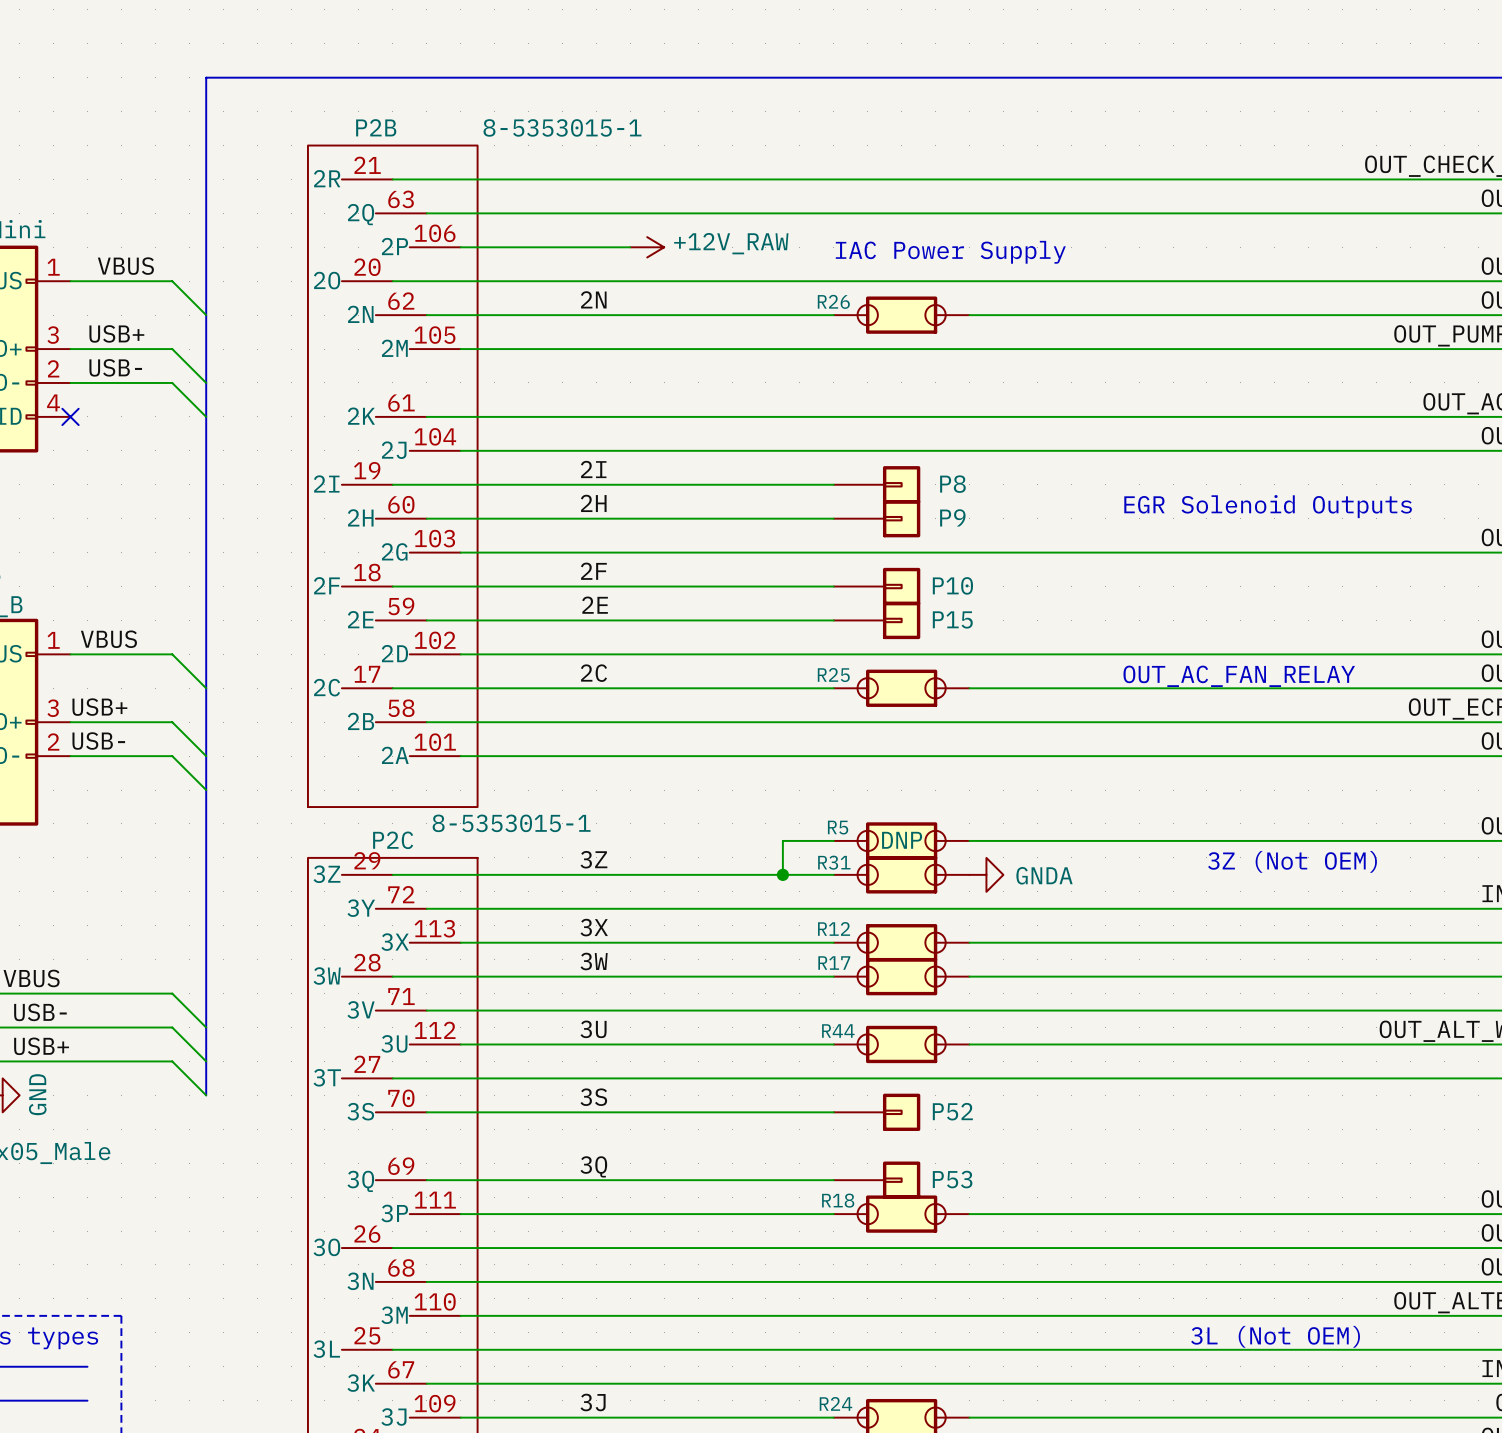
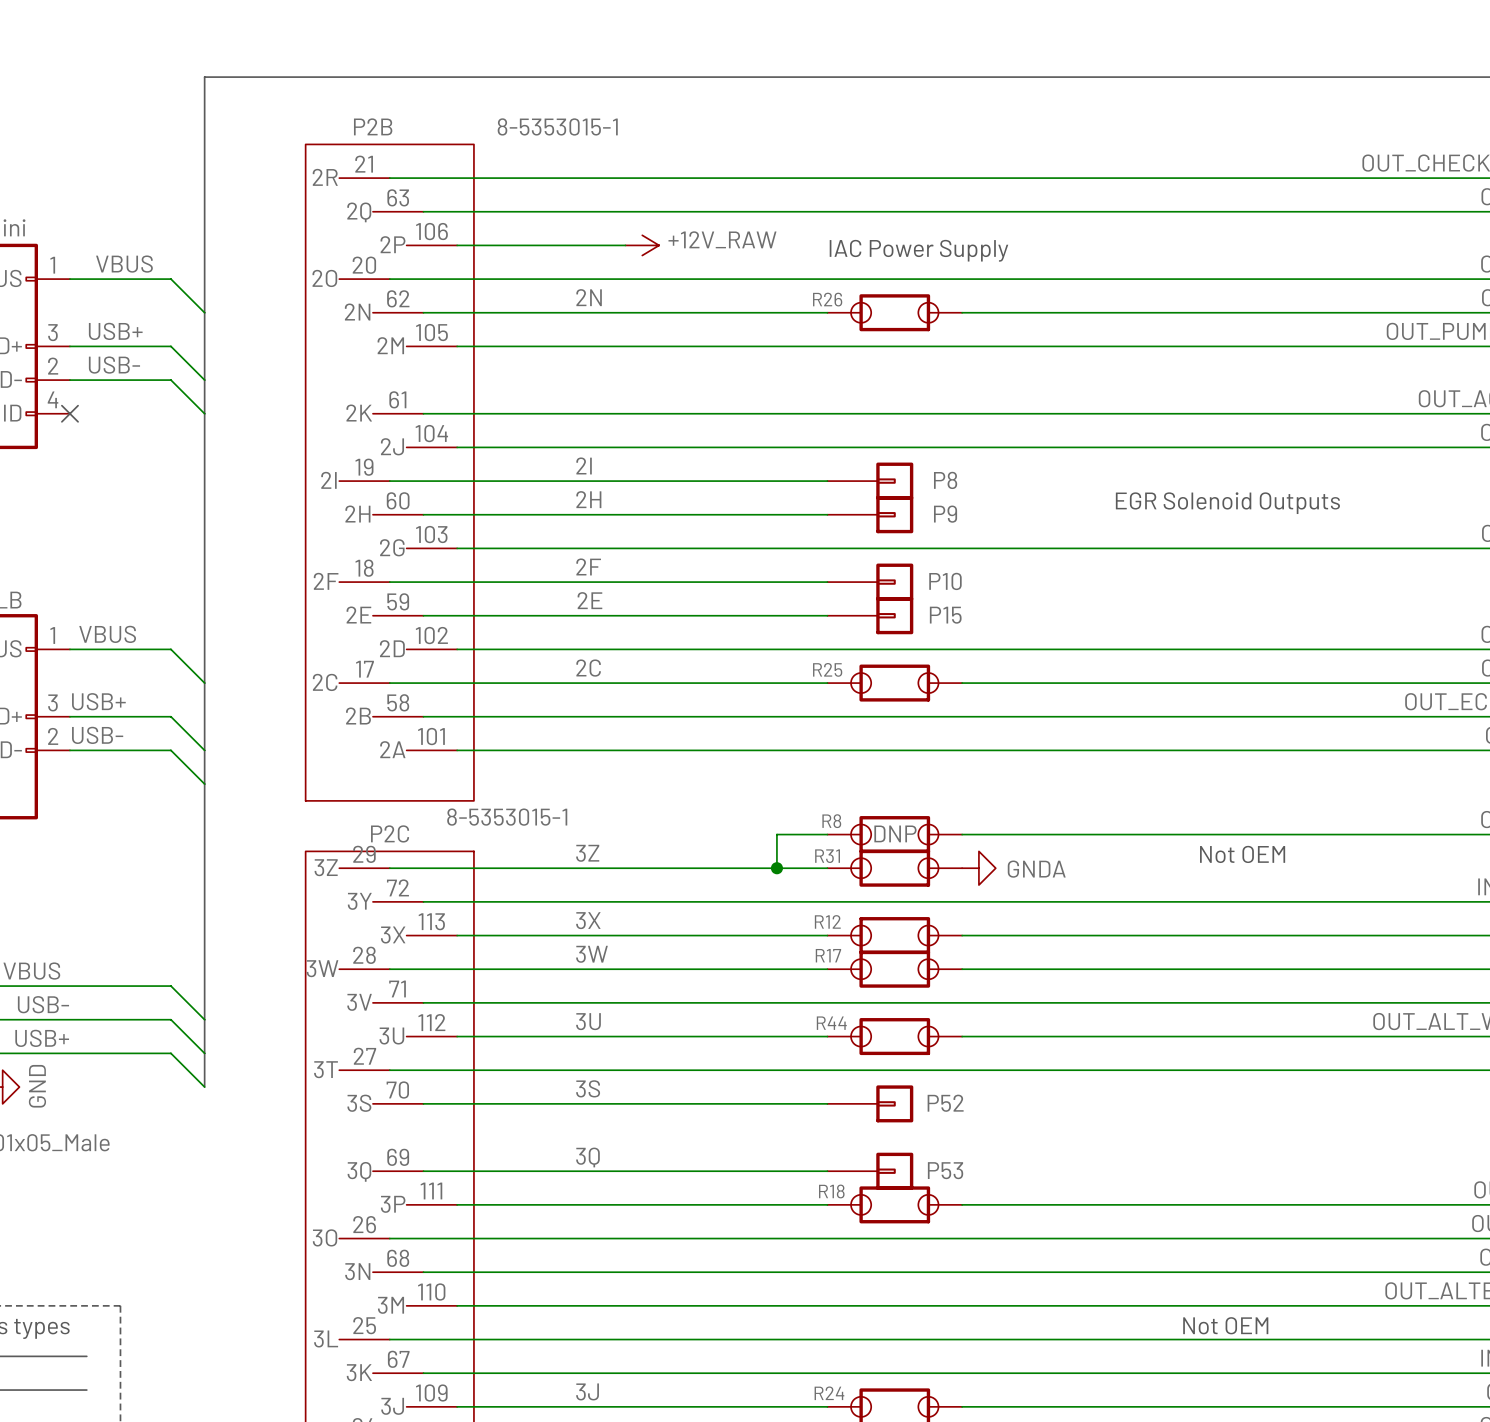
text: OUT_AC_FAN_RELAY (1239, 676) -> none
R5 name: R5 (838, 827) -> R8 (831, 821)
text: 3Z (Not OEM) (1292, 861) -> Not OEM (1242, 854)
text: 3L (Not OEM) (1275, 1336) -> Not OEM (1225, 1325)

